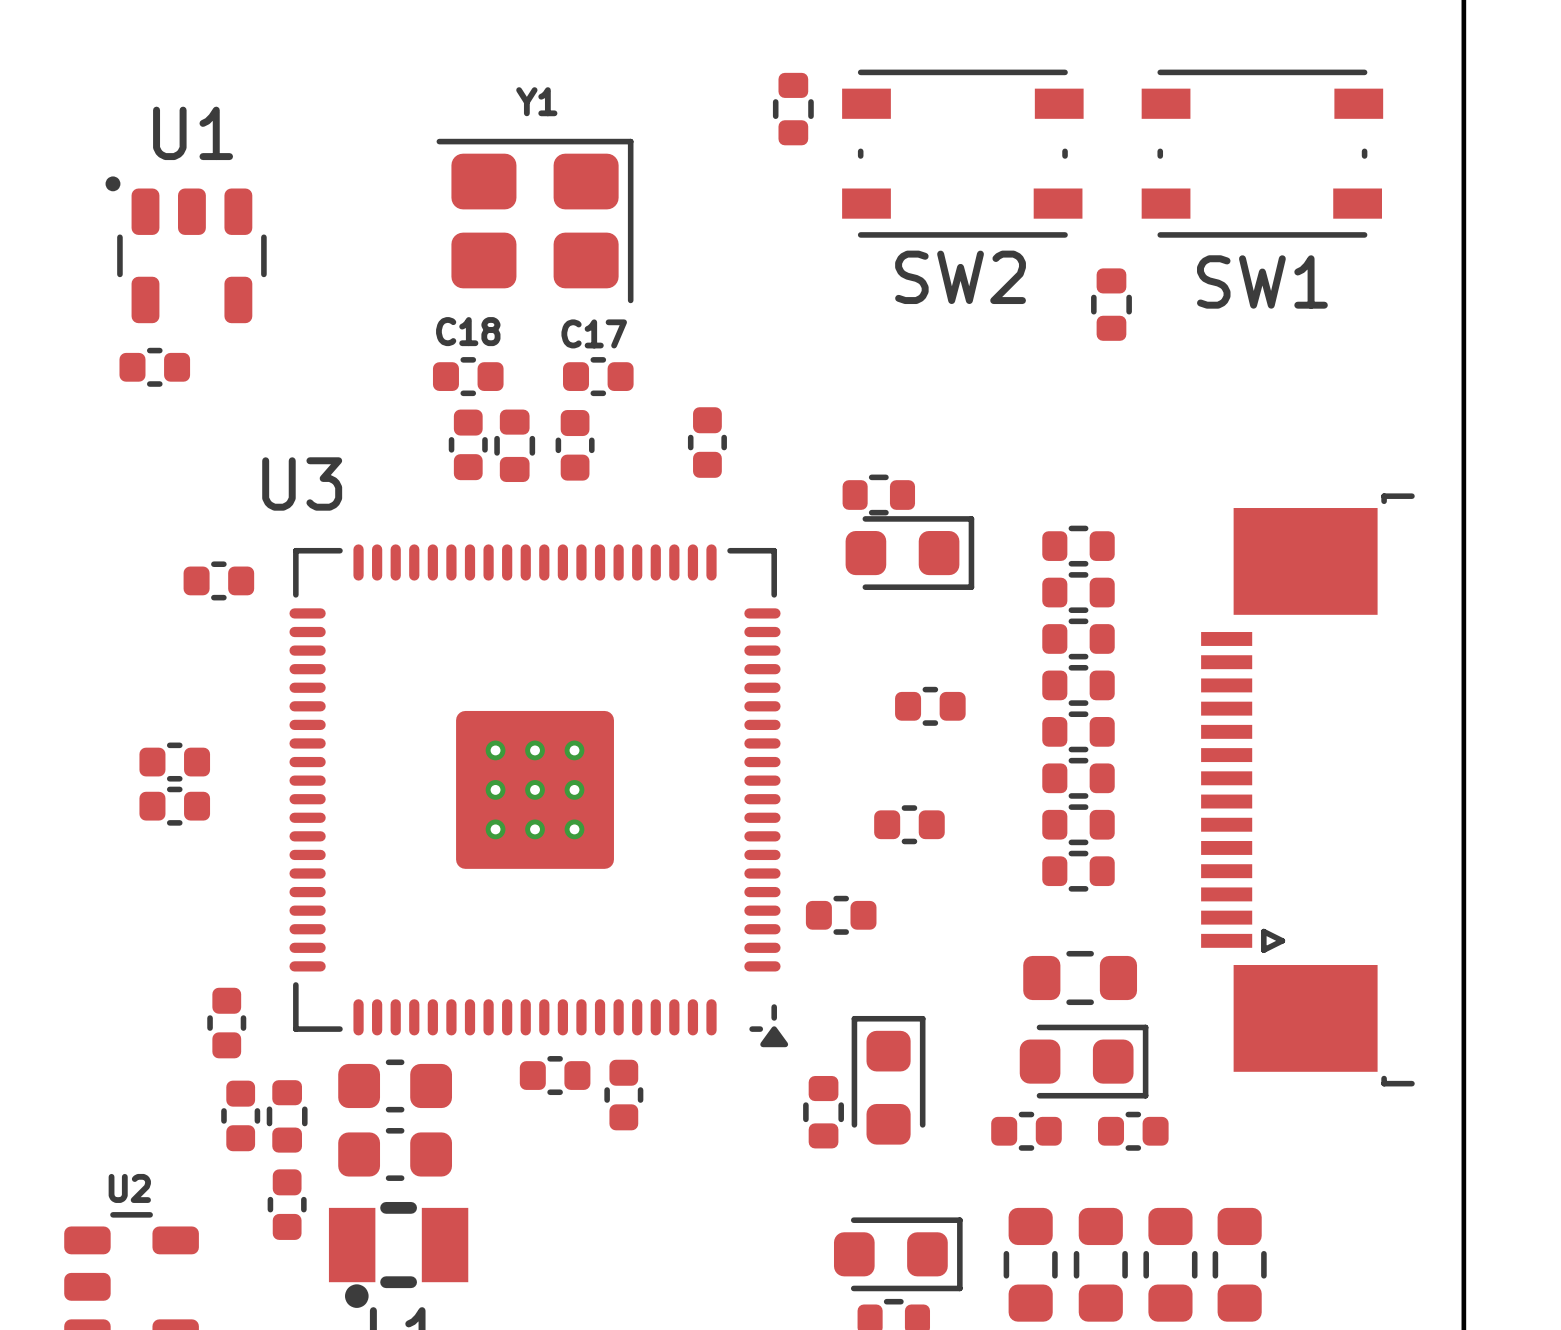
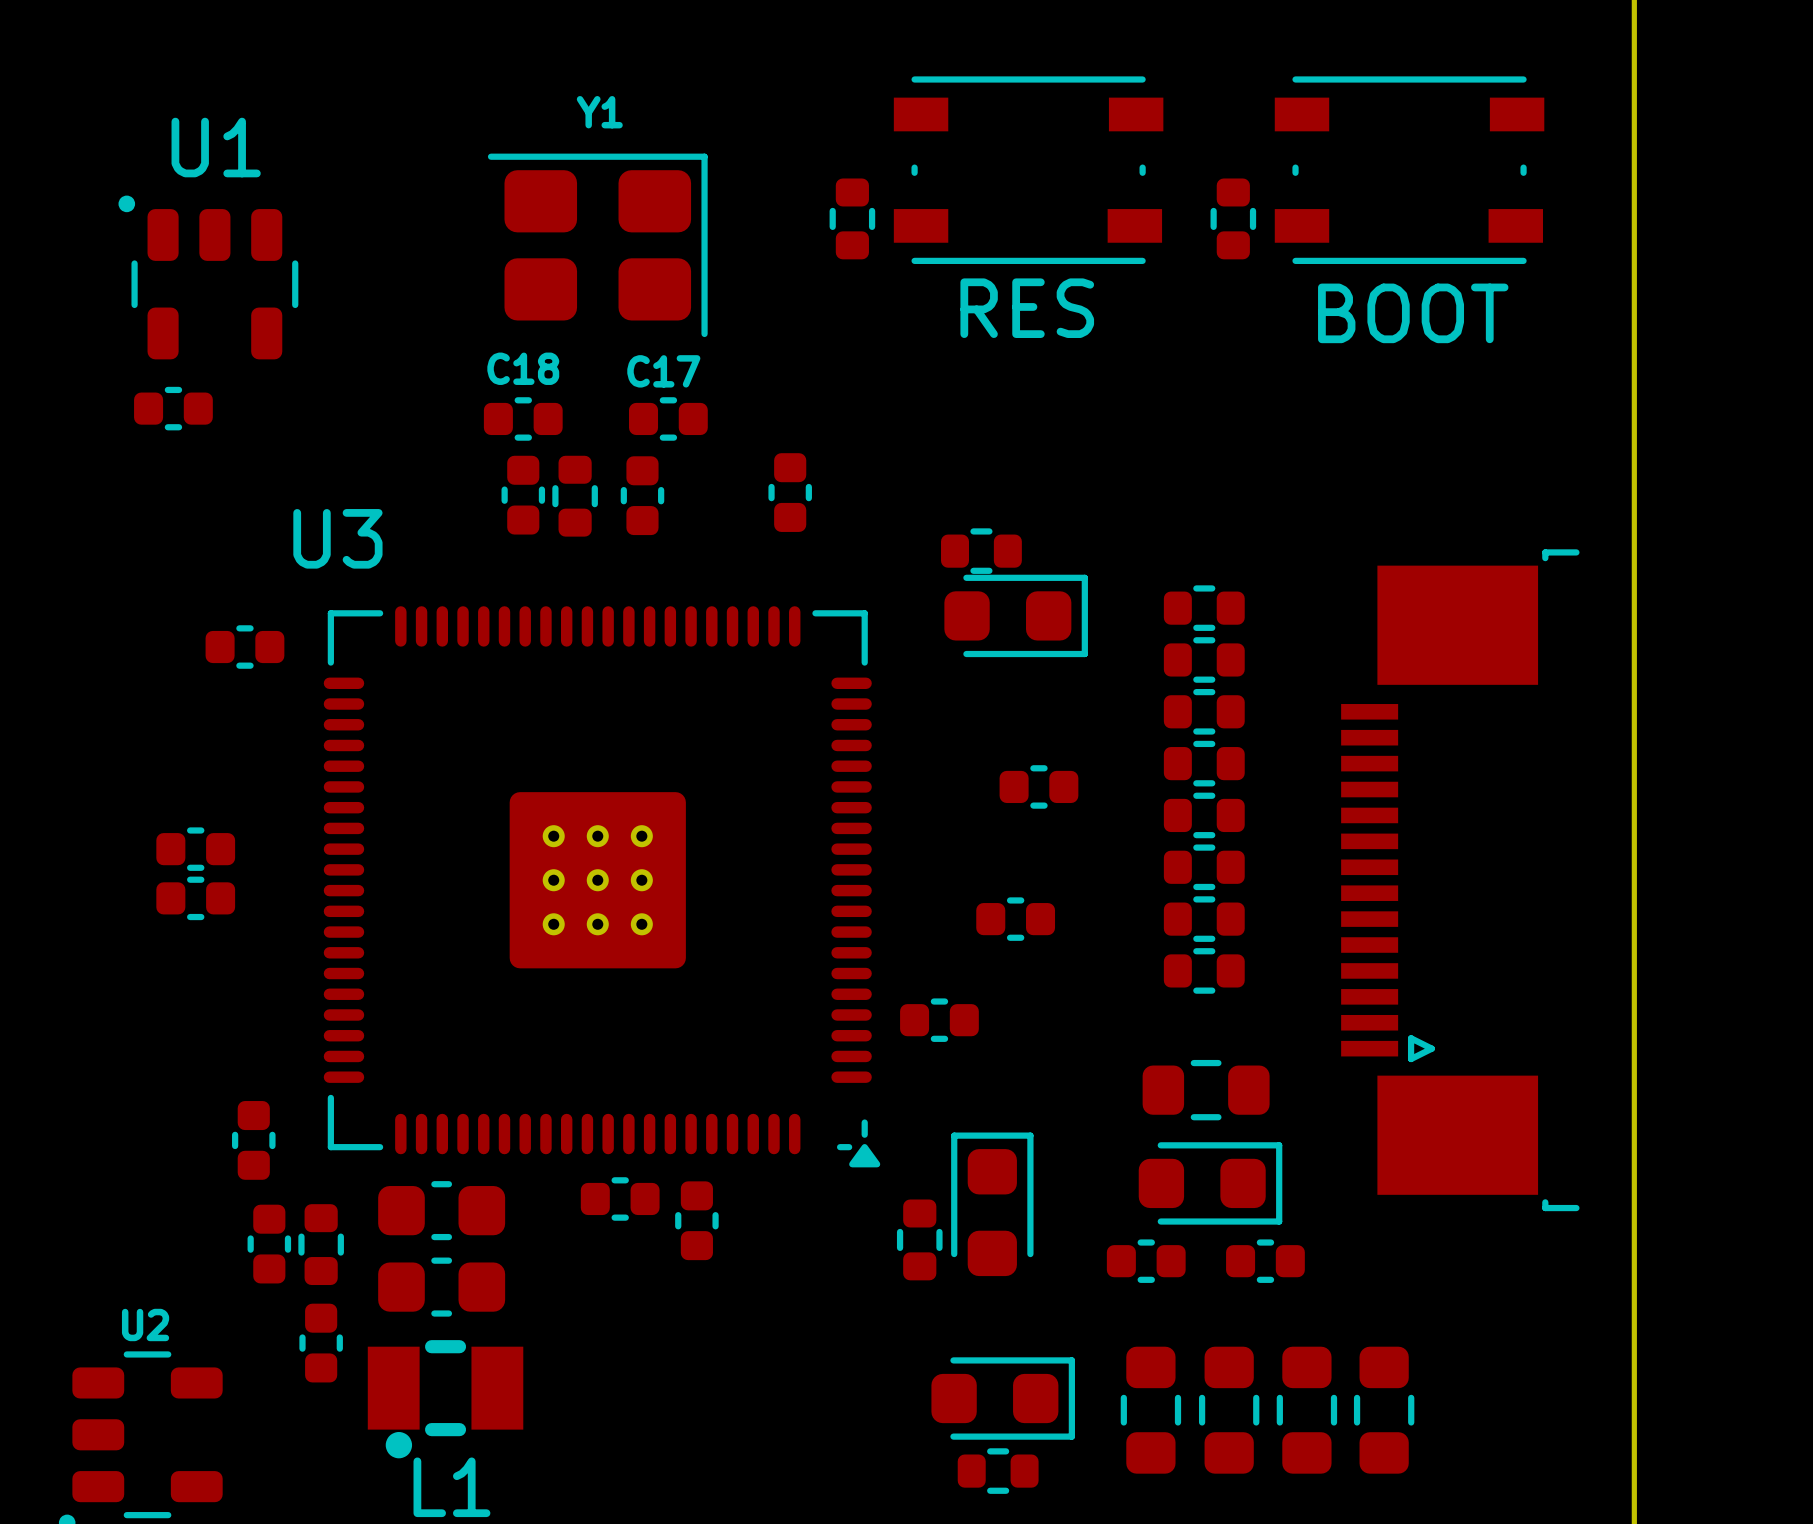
part position: (793, 109) -> (852, 218)
SW2 position: (962, 153) -> (1028, 170)
SW2 name: SW2 (960, 277) -> RES (1027, 308)
SW1 name: SW1 (1262, 281) -> BOOT (1413, 313)
part position: (1111, 304) -> (1233, 218)

